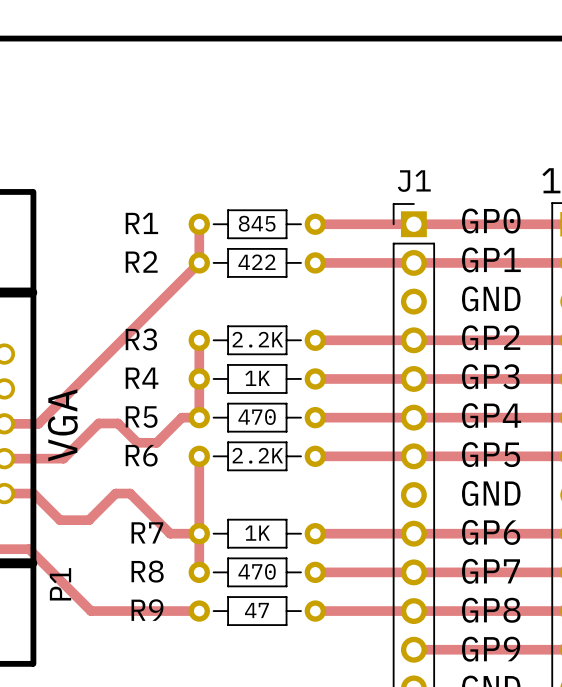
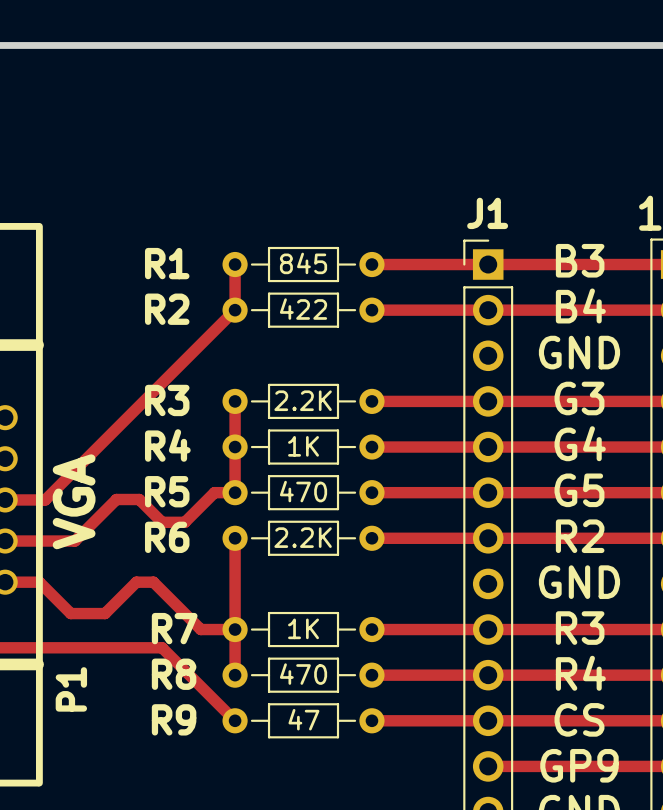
text: GP0 (491, 221) -> B3 (580, 260)
text: GP1 (491, 259) -> B4 (580, 305)
text: GP2 (491, 337) -> G3 (579, 398)
text: GP3 (490, 376) -> G4 (580, 443)
text: GP4 (491, 415) -> G5 (579, 490)
text: GP5 (491, 454) -> R2 (580, 536)
text: GP6 (491, 532) -> R3 (580, 628)
top track: (29, 549) (90, 611) (199, 611) -> (34, 647) (162, 647) (235, 720)
text: GP7 (491, 571) -> R4 (580, 673)
text: GP8 (491, 610) -> CS (579, 719)

